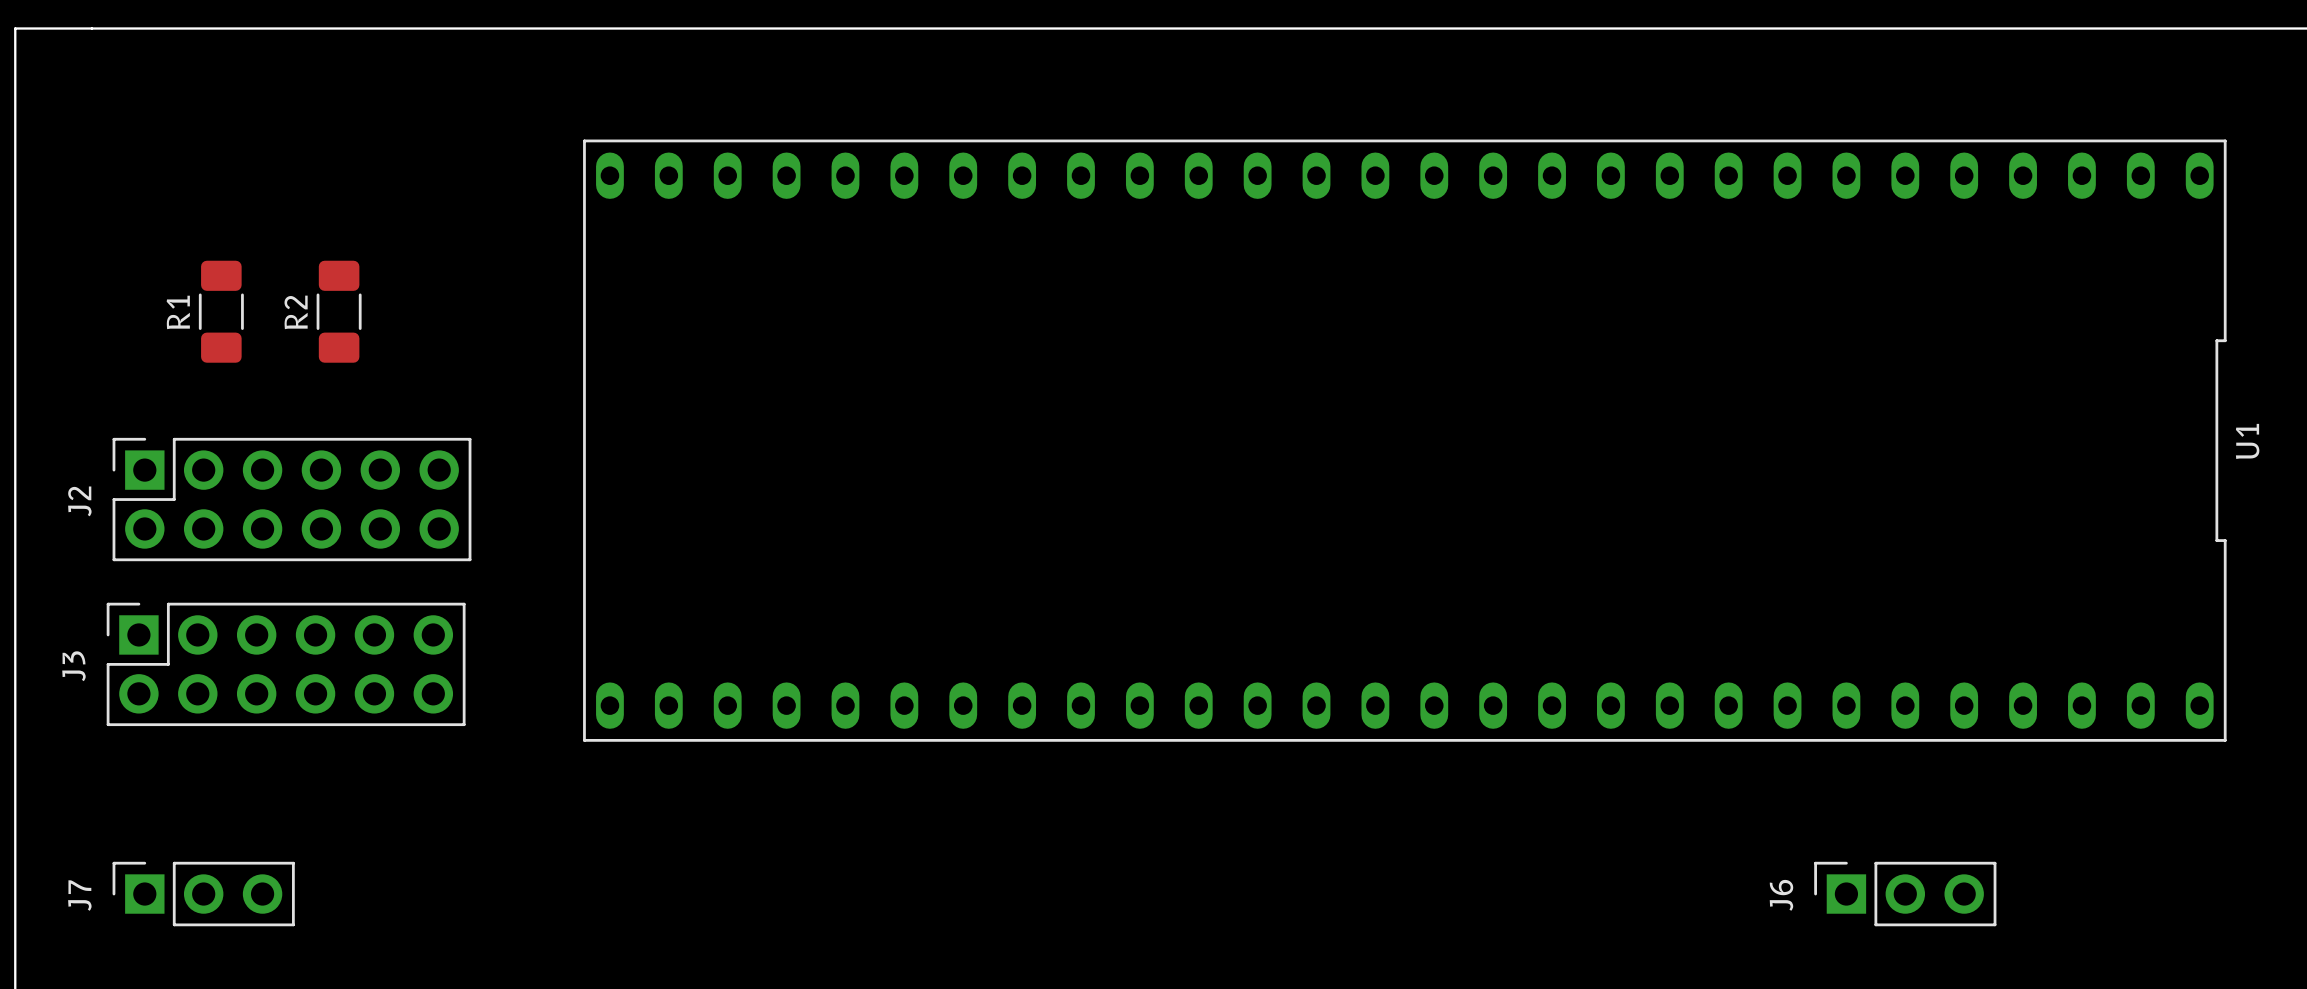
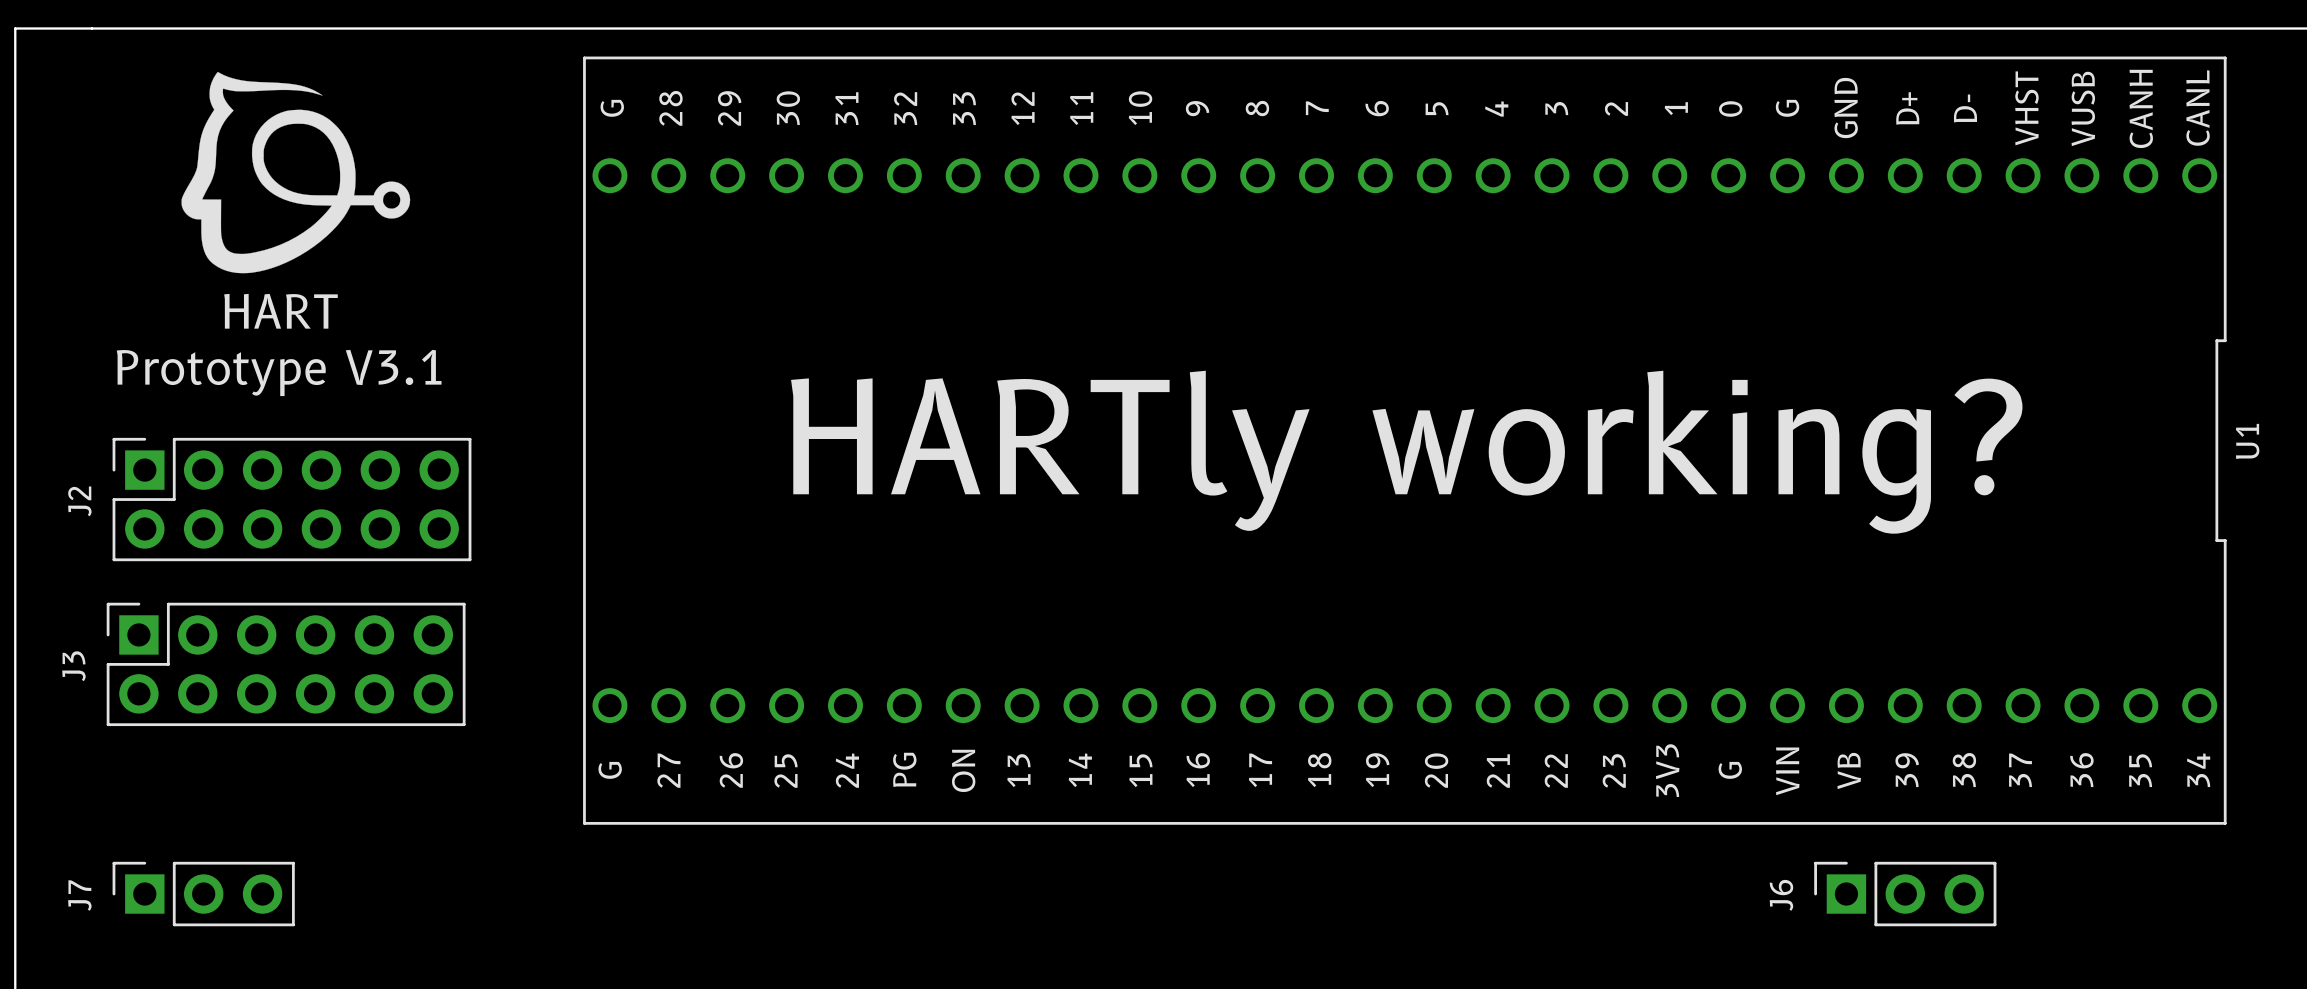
drawing: none -> [181, 71, 411, 274]
U1 footprint: [583, 139, 2227, 742] -> [583, 56, 2227, 825]
R1: (221, 311) -> none
text: none -> HART (280, 311)
R2: (339, 311) -> none
text: none -> Prototype V3.1 (279, 372)

